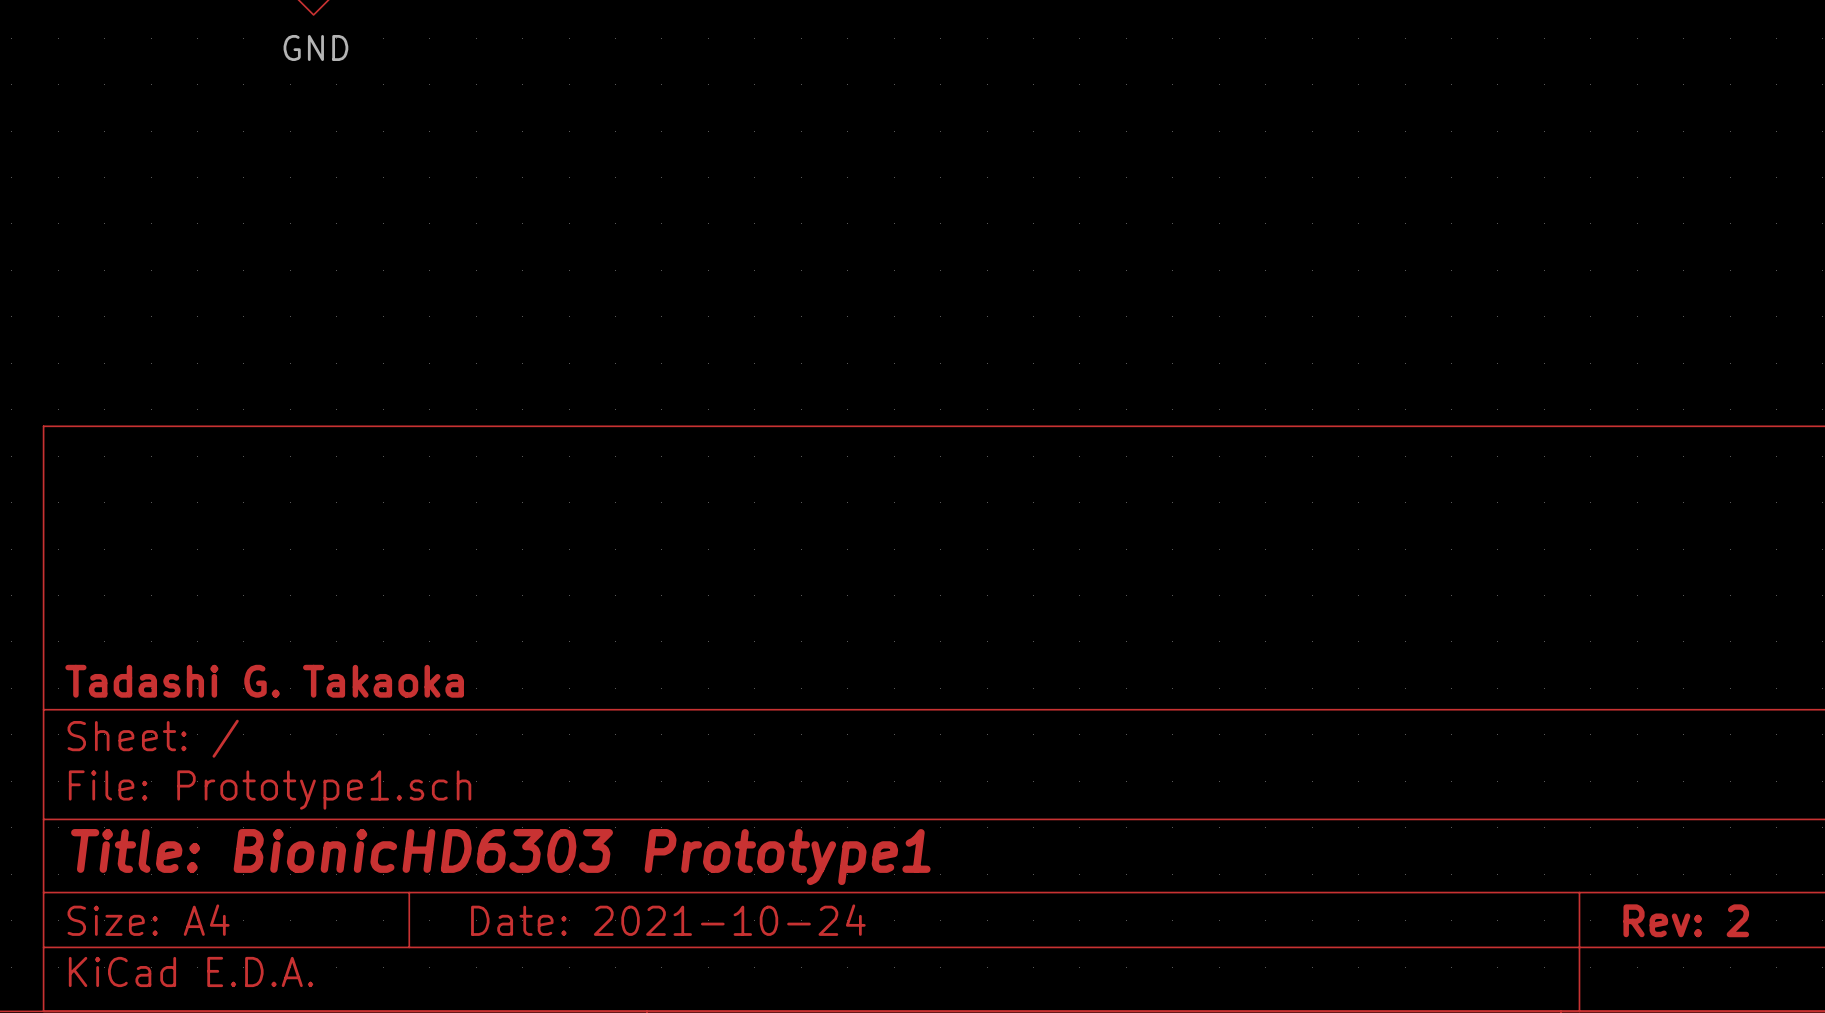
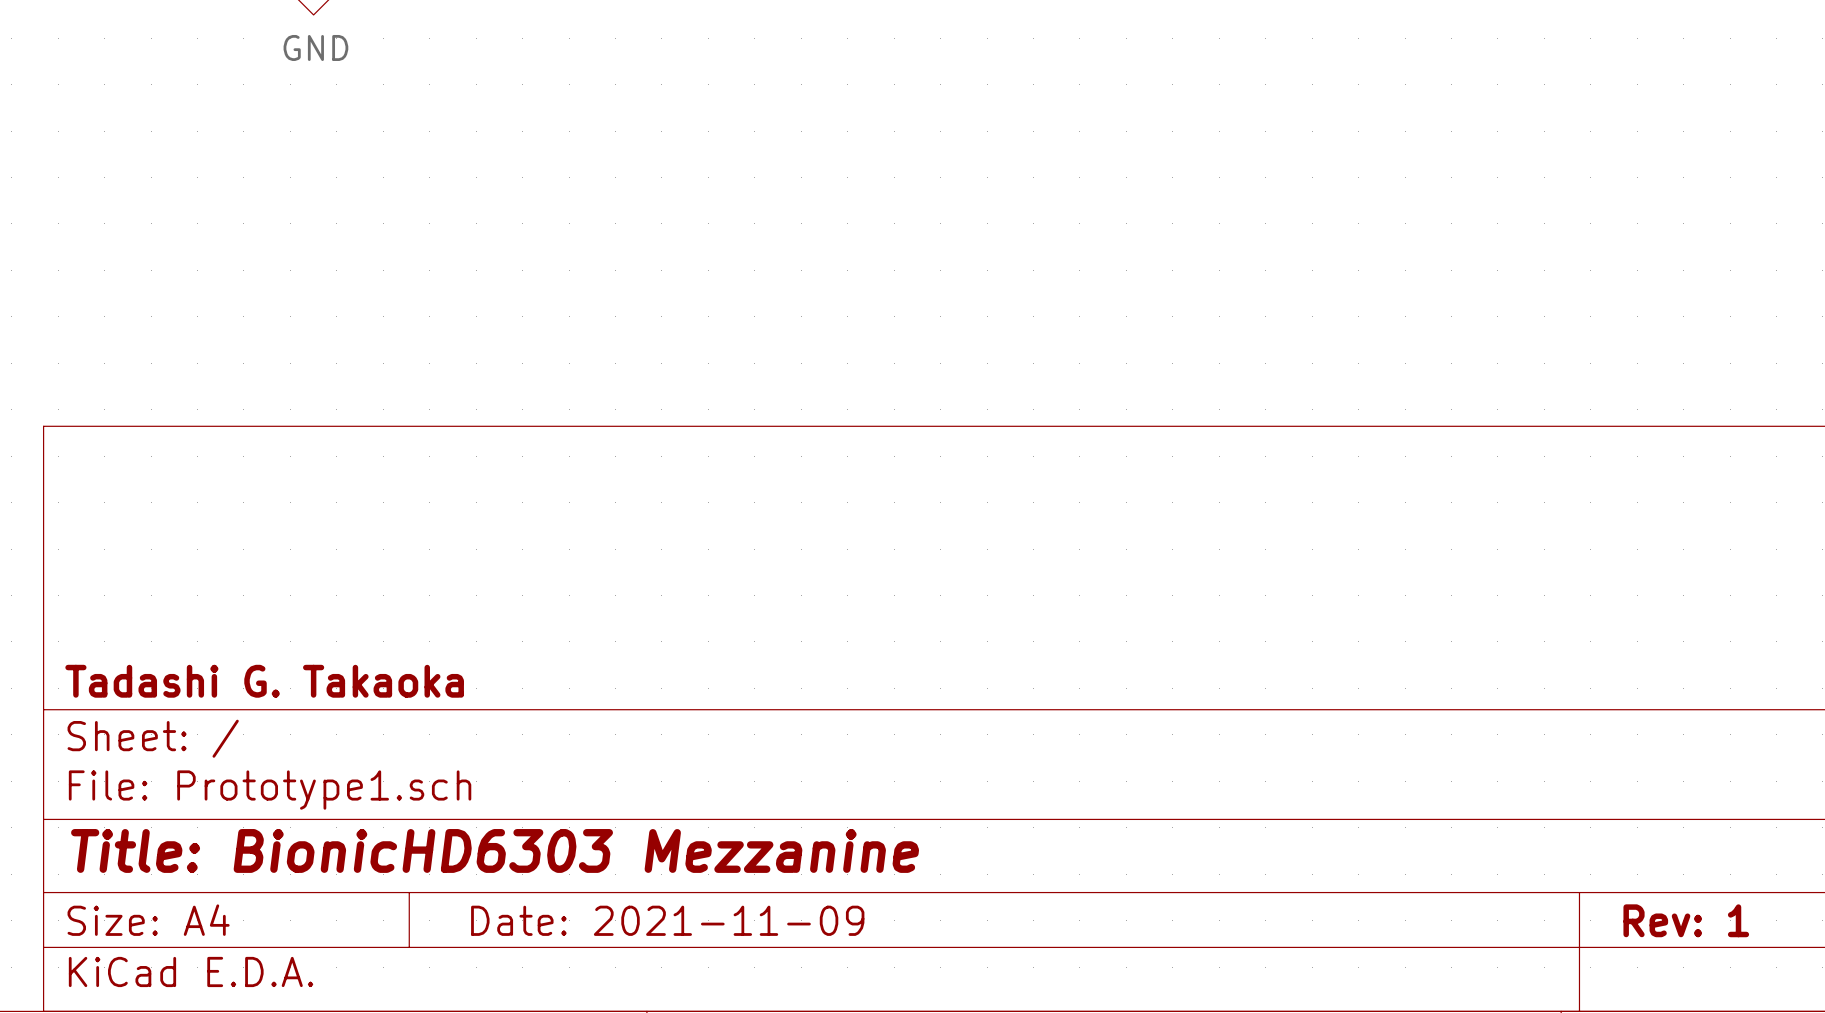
title block: Title: BionicHD6303 Prototype1 (500, 857) -> Title: BionicHD6303 Mezzanine (495, 850)
title block: Date: 2021-10-24 (668, 920) -> Date: 2021-11-09 (667, 920)
title block: Rev: 2 (1686, 920) -> Rev: 1 (1686, 920)

